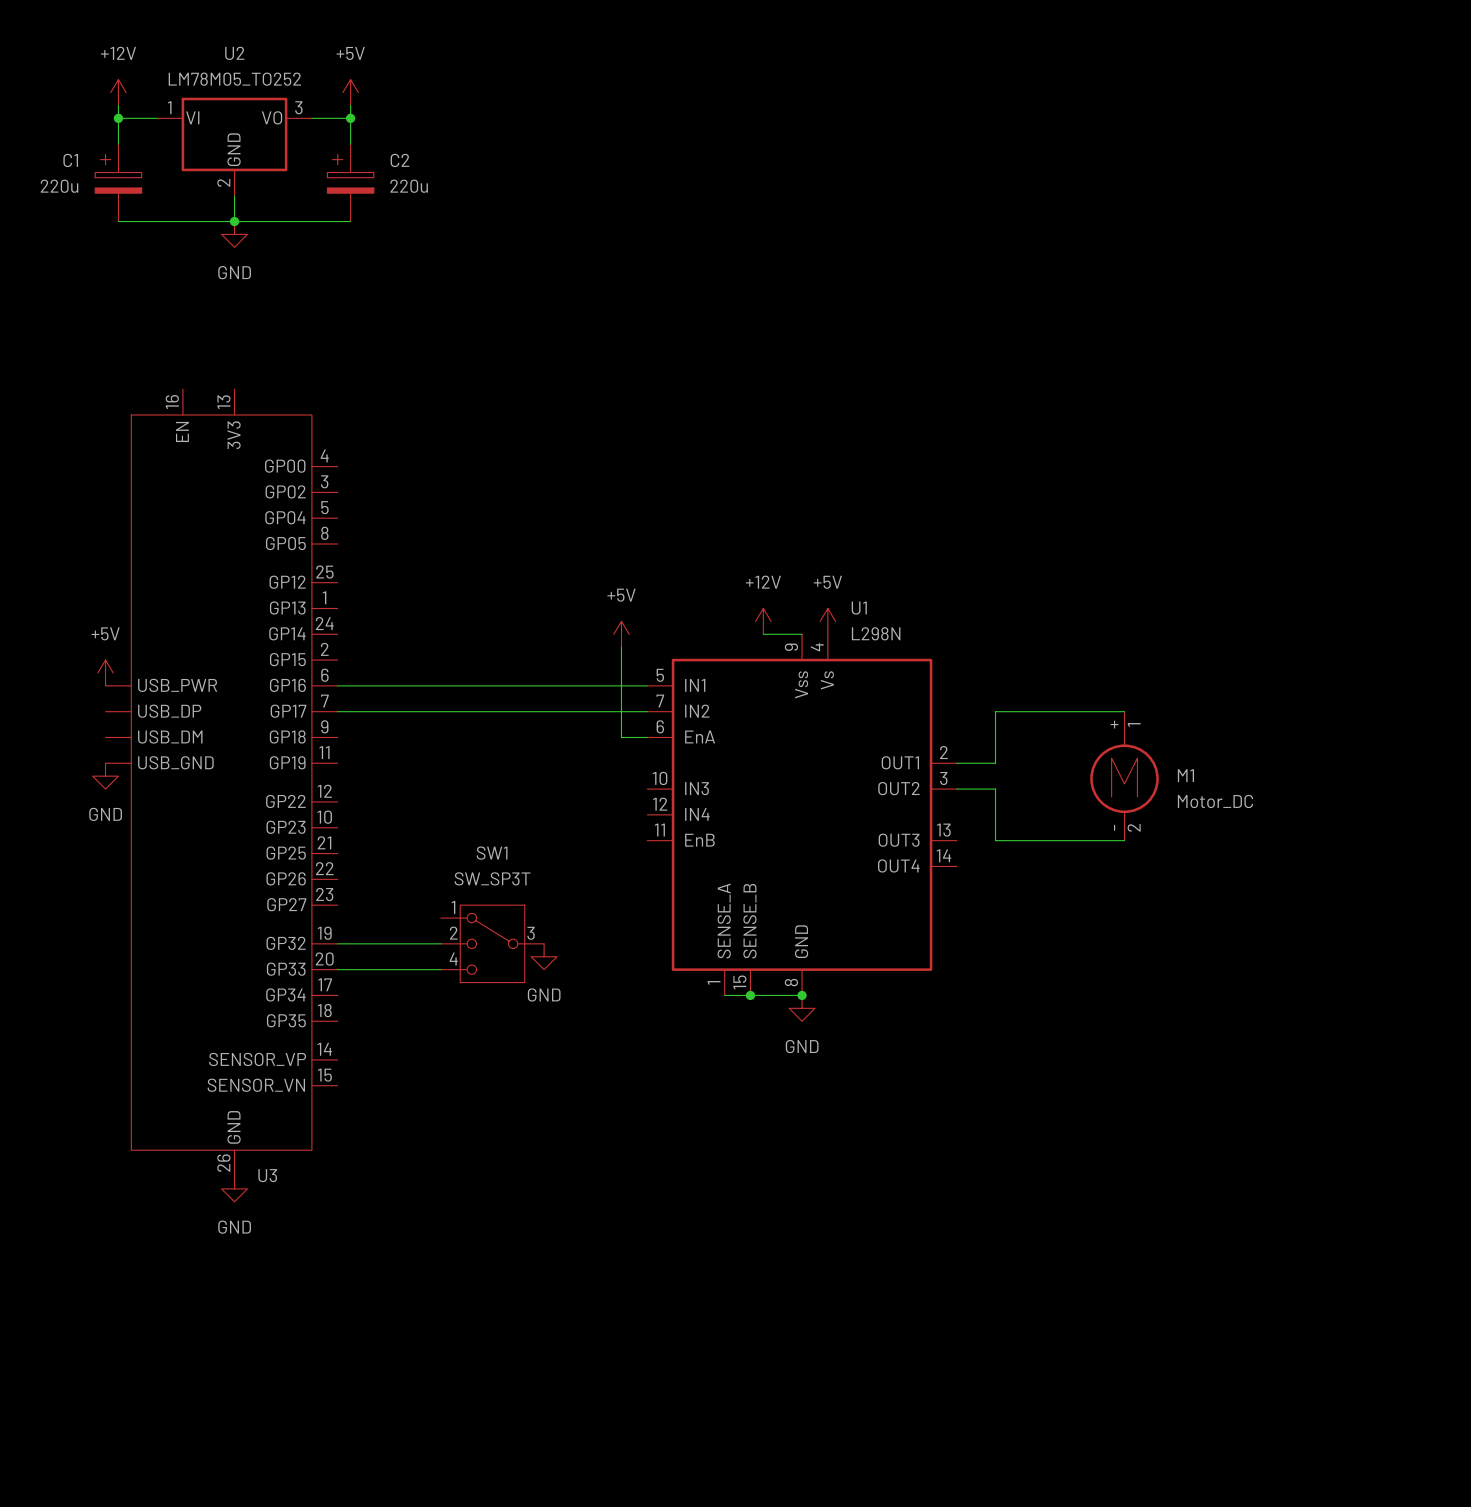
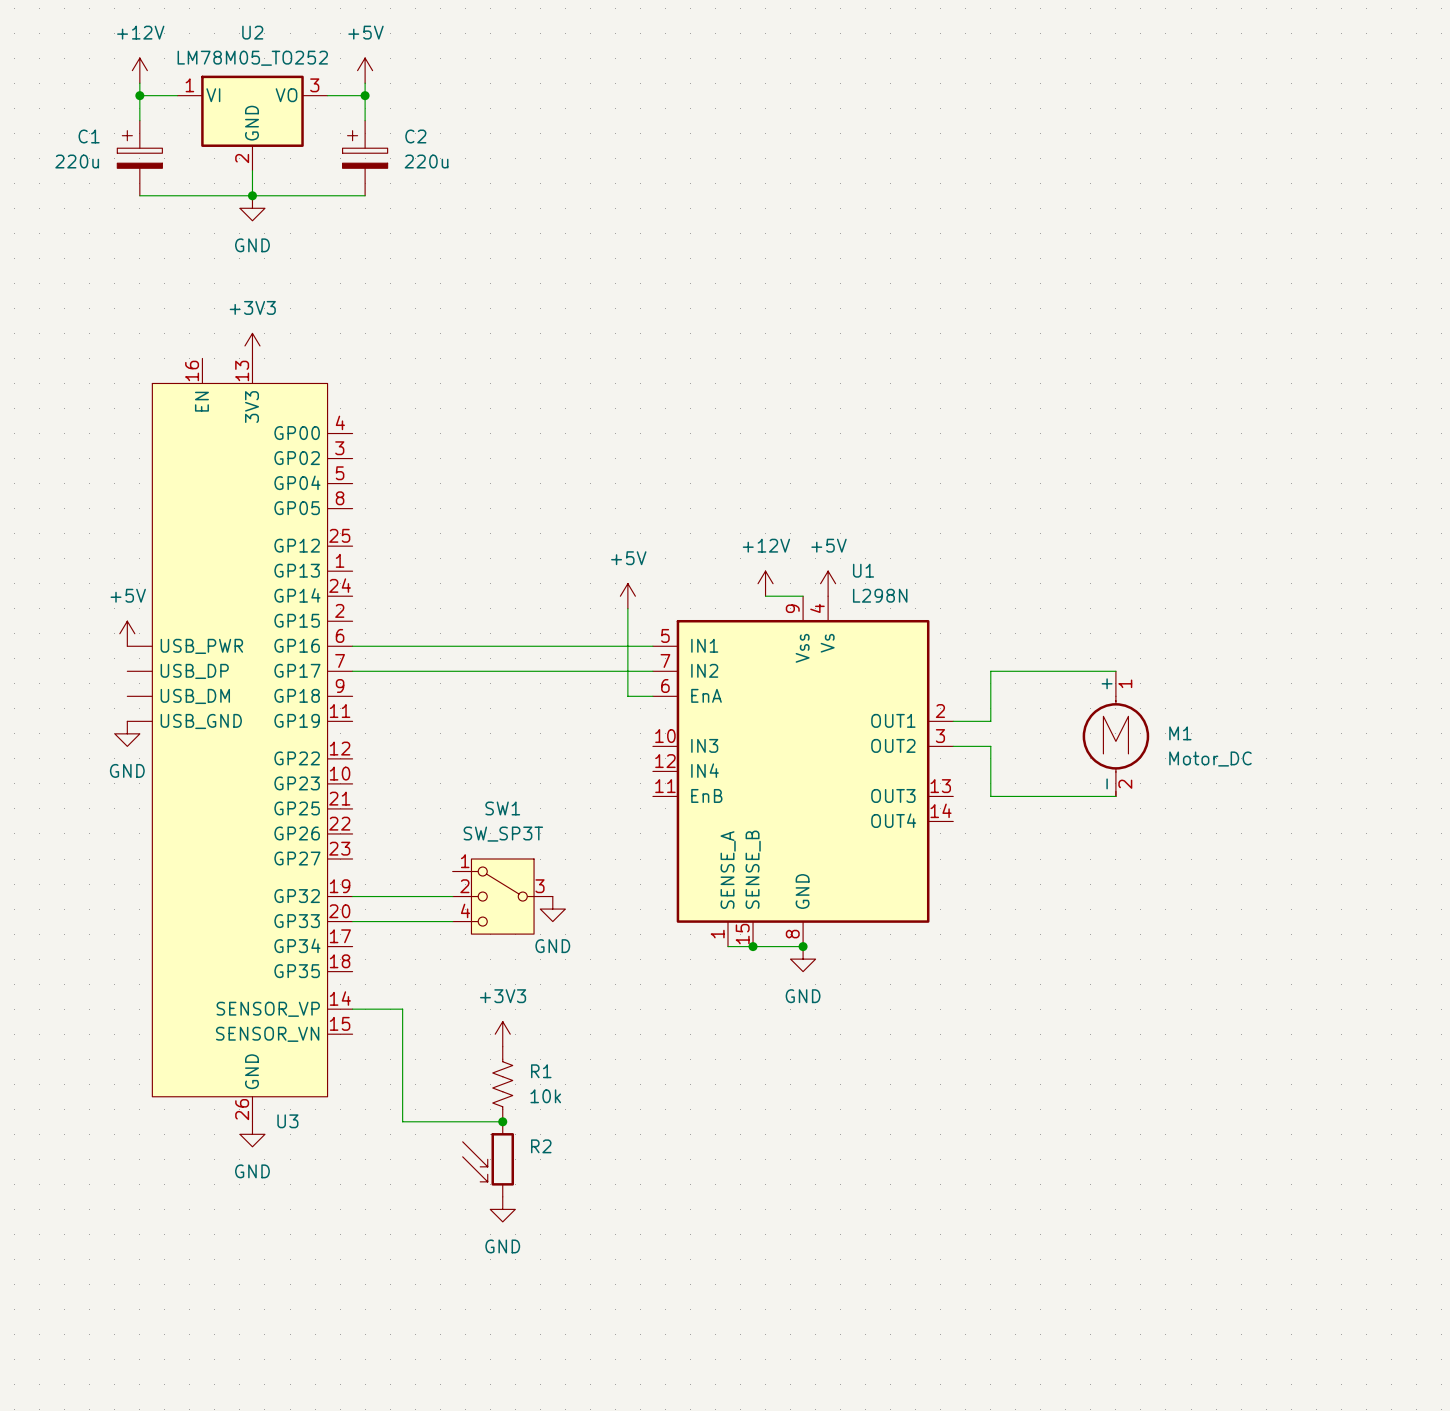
power symbol: none -> +3V3 (252, 345)
wire: none -> (352, 1009) (402, 1009) (402, 1121) (502, 1121)
power symbol: none -> +3V3 (502, 1034)
R1: none -> 10k (502, 1084)
junction: none -> (502, 1121)
R2: none -> (488, 1159)
power symbol: none -> GND (502, 1209)

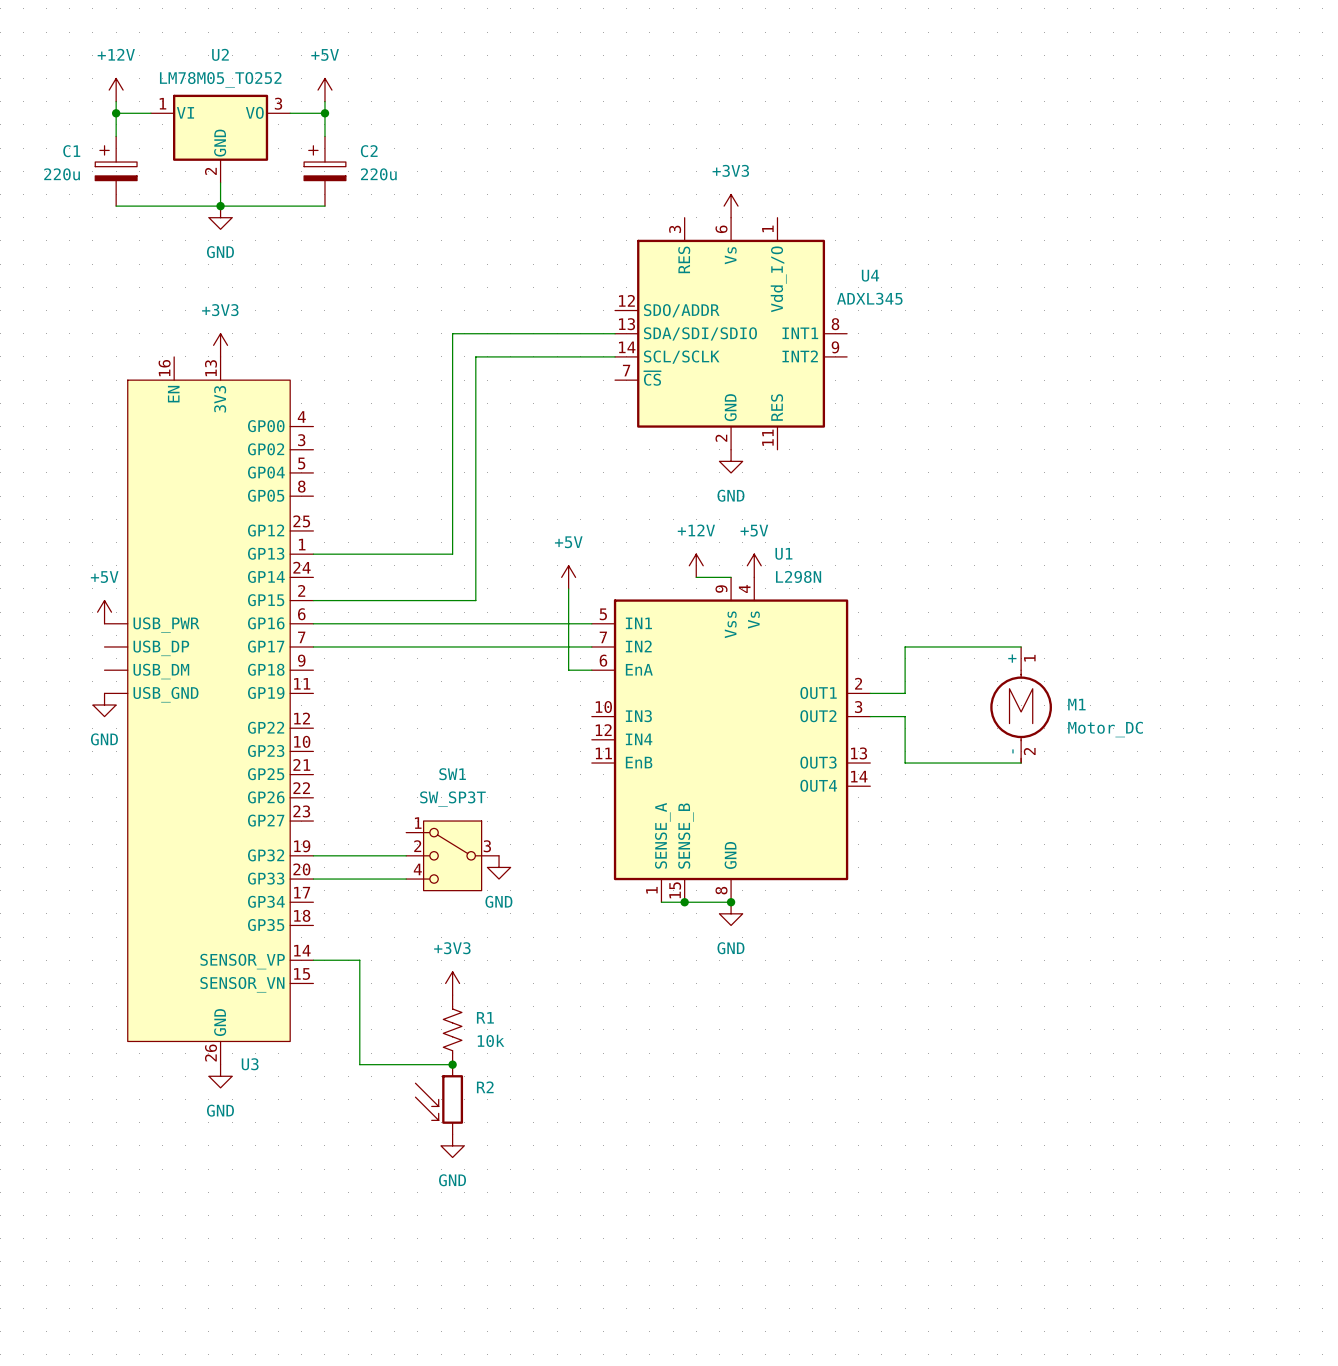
power symbol: none -> +3V3 (731, 206)
wire: none -> (615, 333) (452, 333) (452, 554) (313, 554)
U4: none -> ADXL345 (731, 333)
wire: none -> (615, 356) (475, 356) (475, 600) (313, 600)
power symbol: none -> GND (731, 461)

